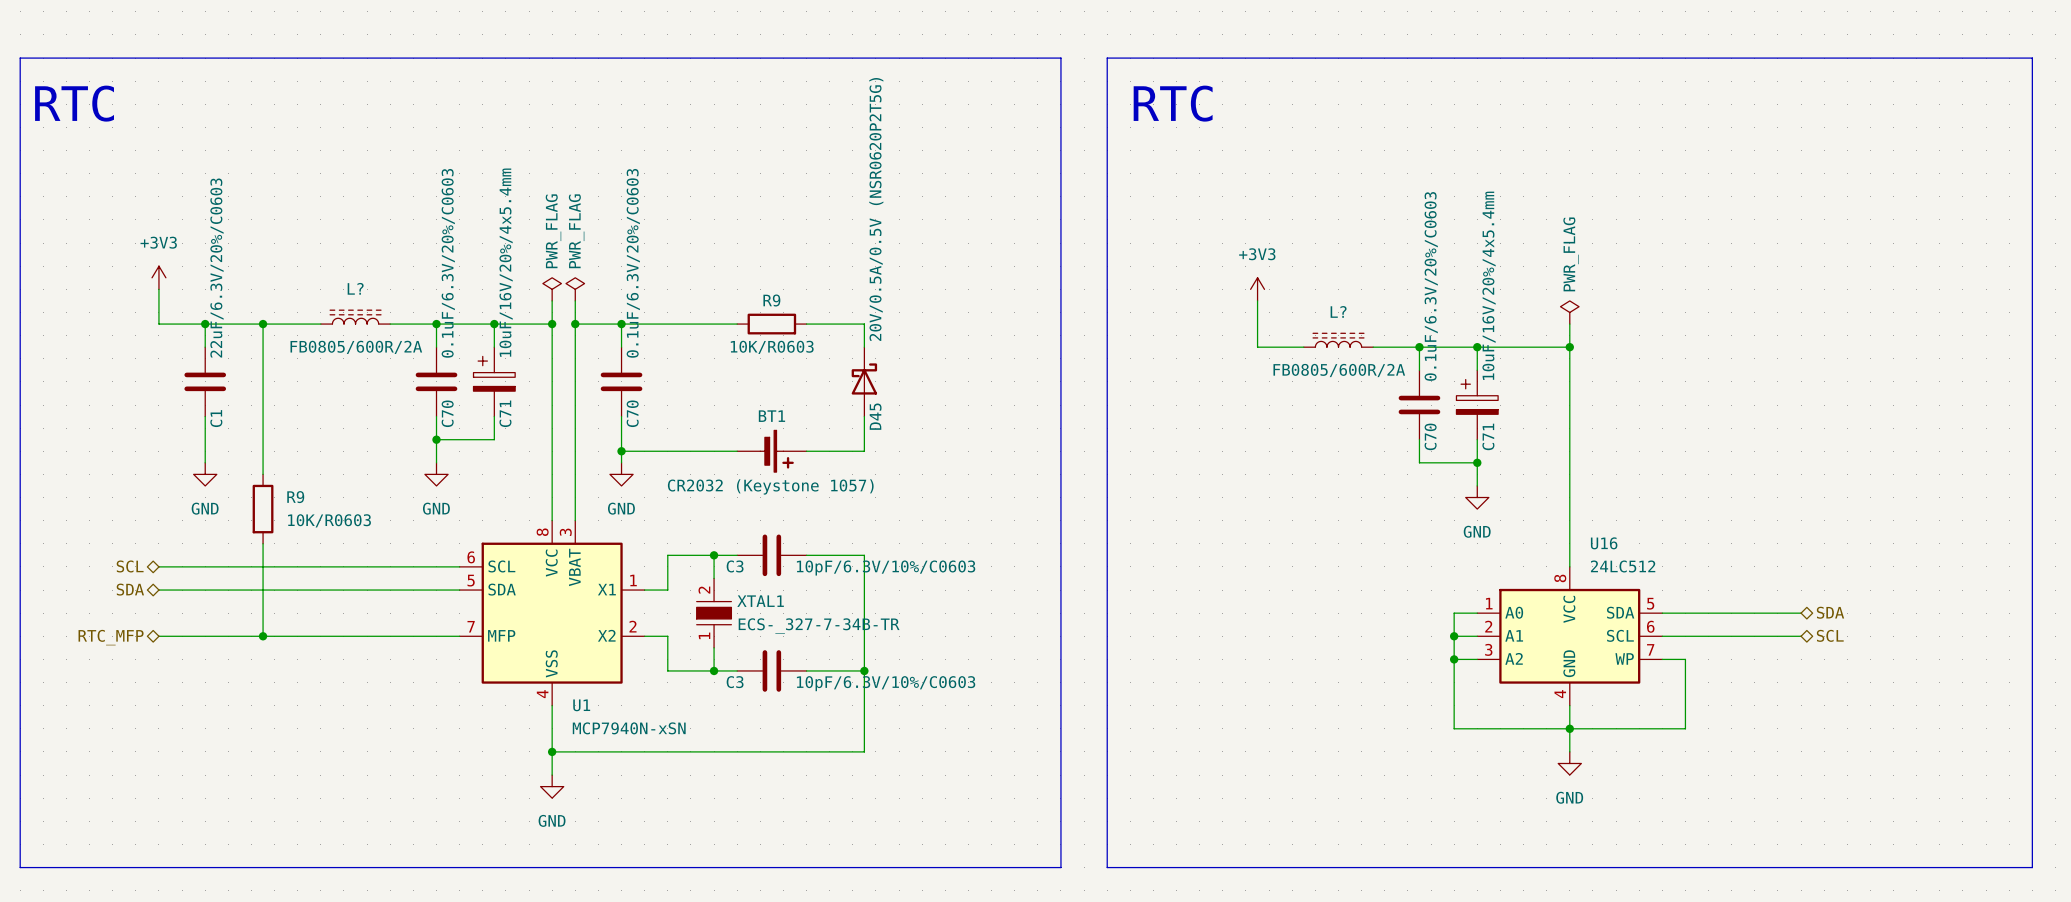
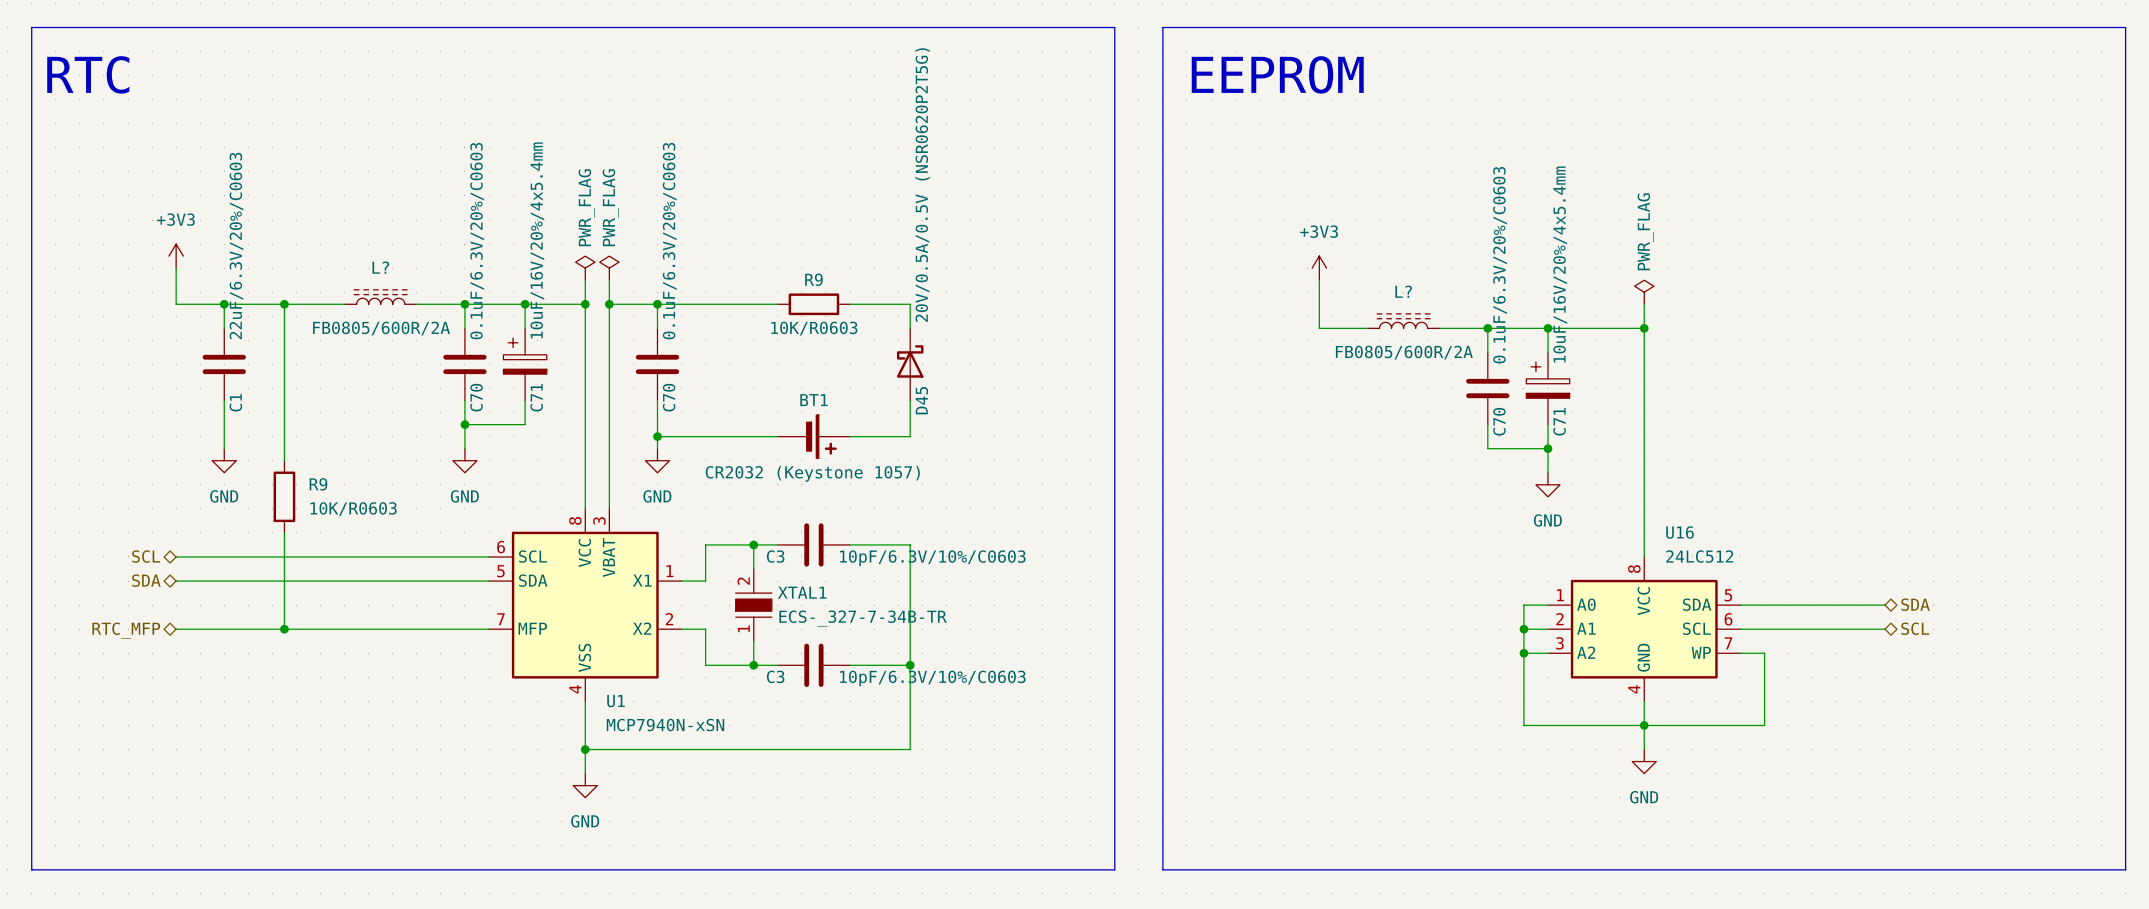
text: RTC (1173, 103) -> EEPROM (1277, 74)

